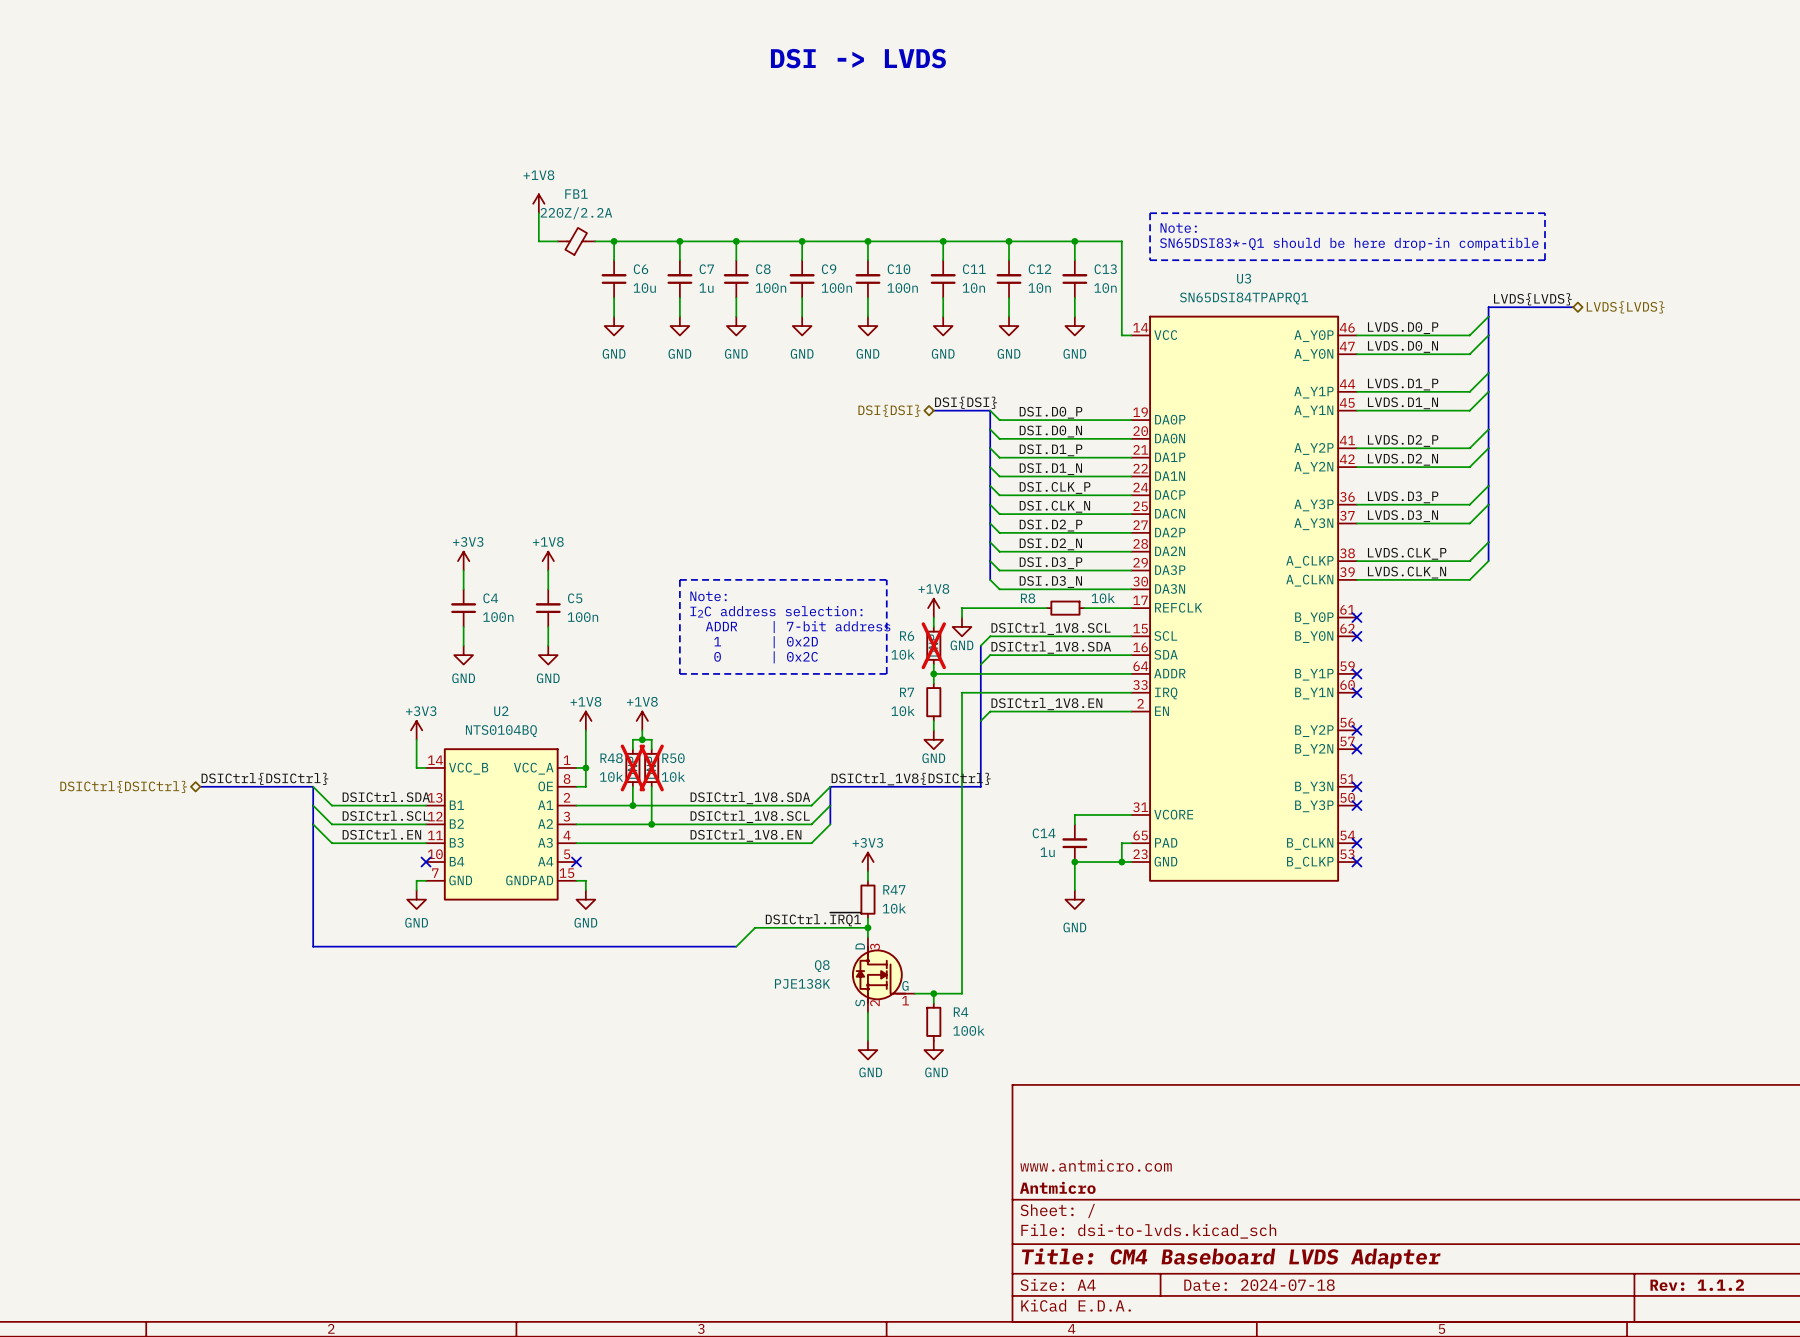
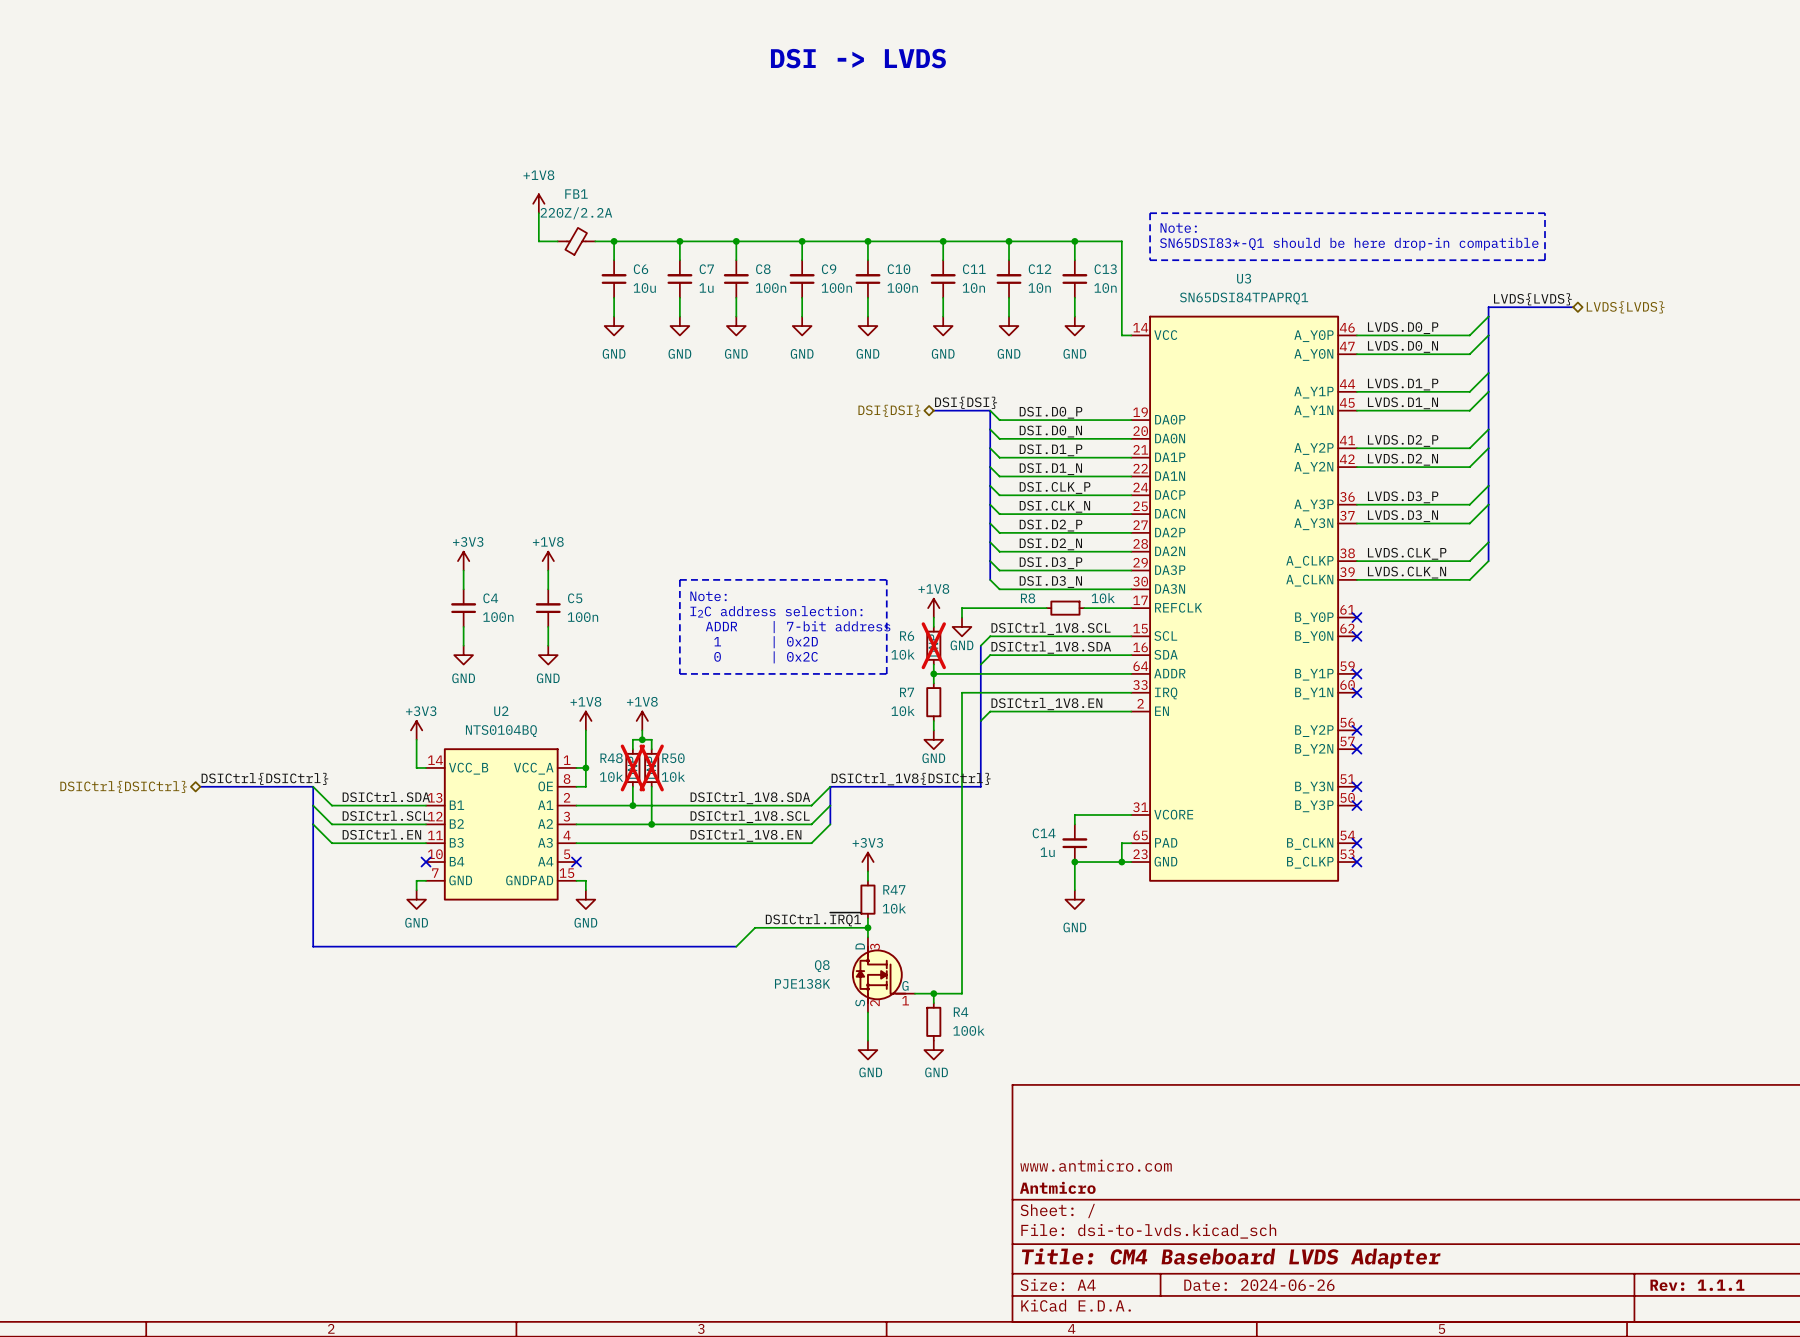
title block: Date: 2024-07-18 (1259, 1285) -> Date: 2024-06-26 (1259, 1285)
title block: Rev: 1.1.2 (1697, 1285) -> Rev: 1.1.1 (1697, 1285)

